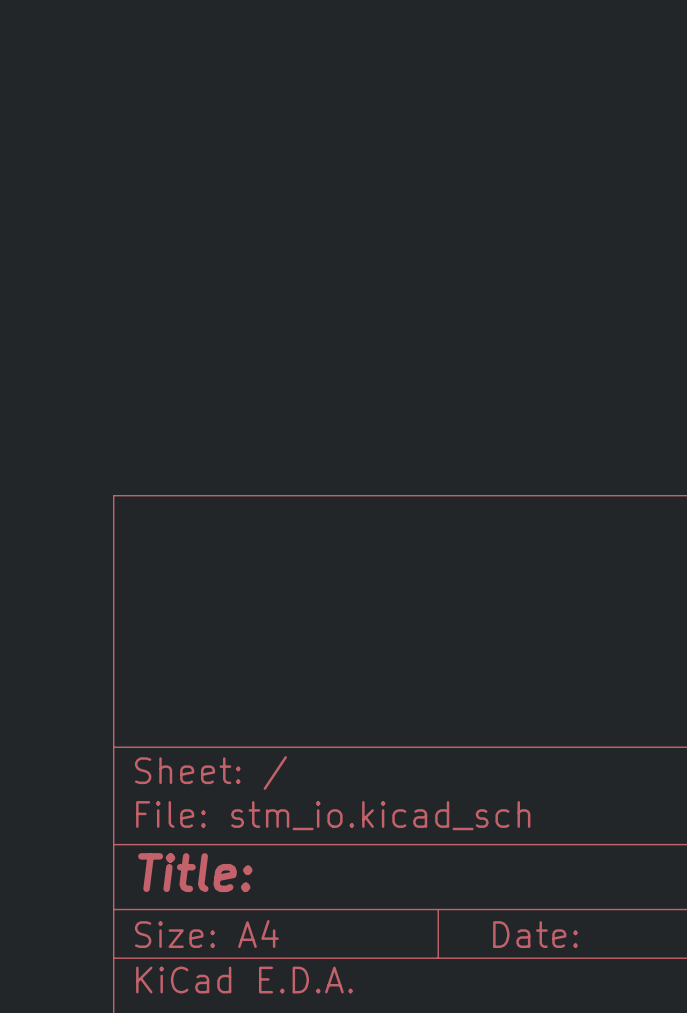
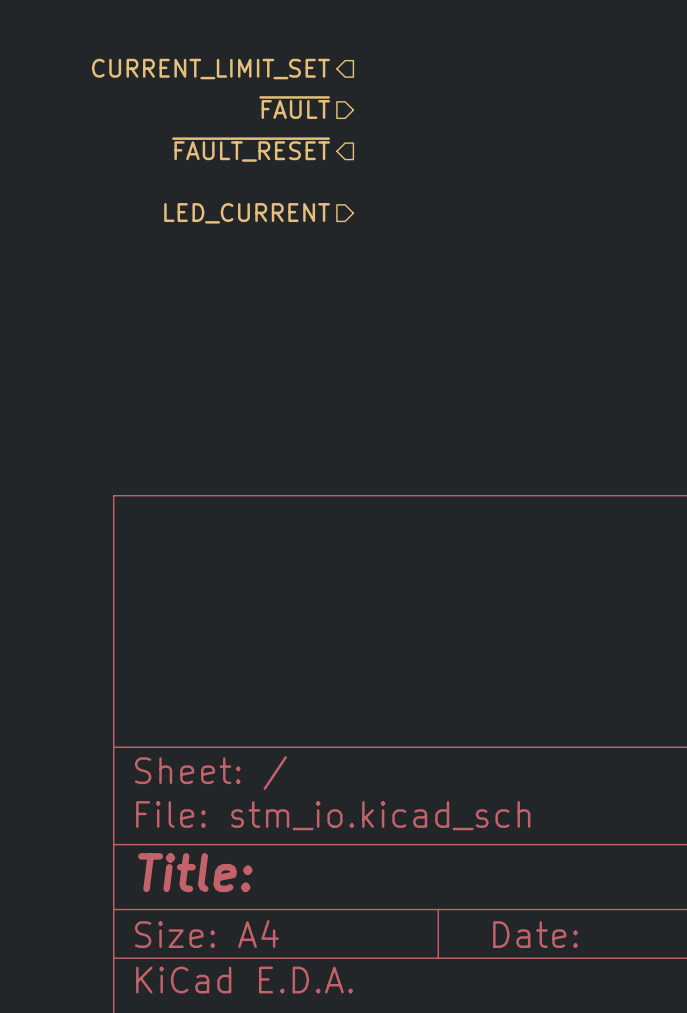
hierarchical label: none -> CURRENT_LIMIT_SET (210, 69)
hierarchical label: none -> ~{FAULT} (294, 107)
hierarchical label: none -> ~{FAULT_RESET} (251, 149)
hierarchical label: none -> LED_CURRENT (247, 213)

